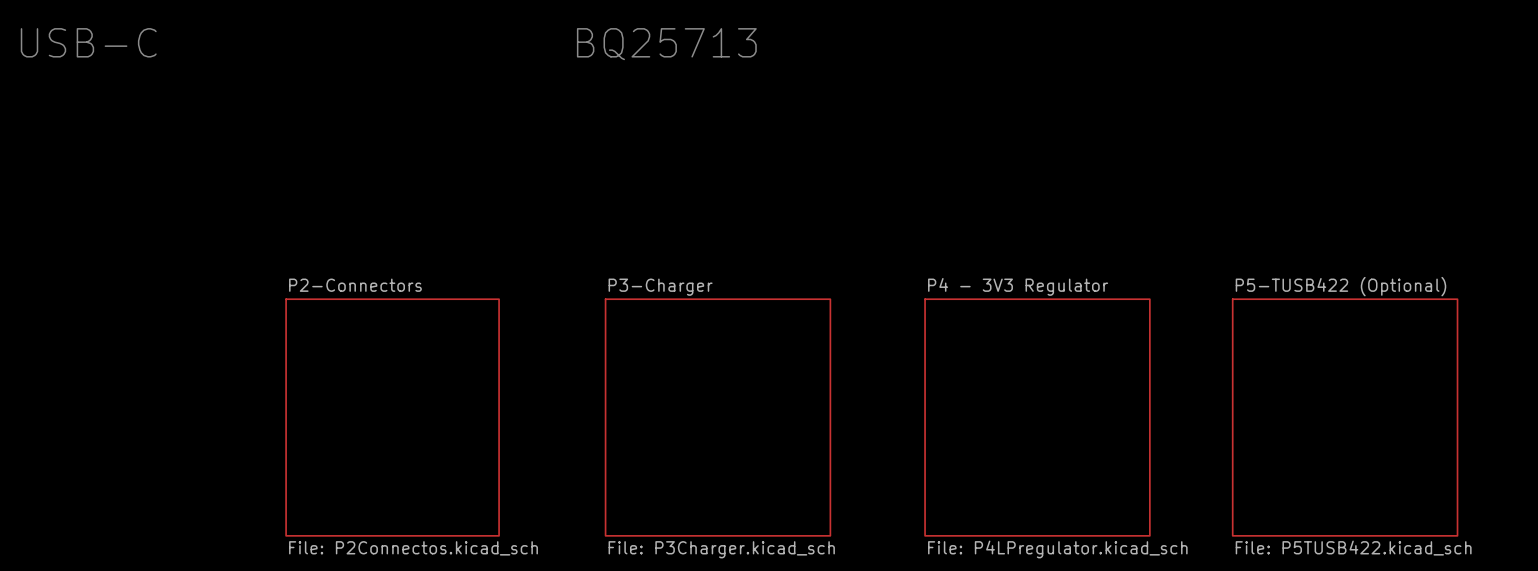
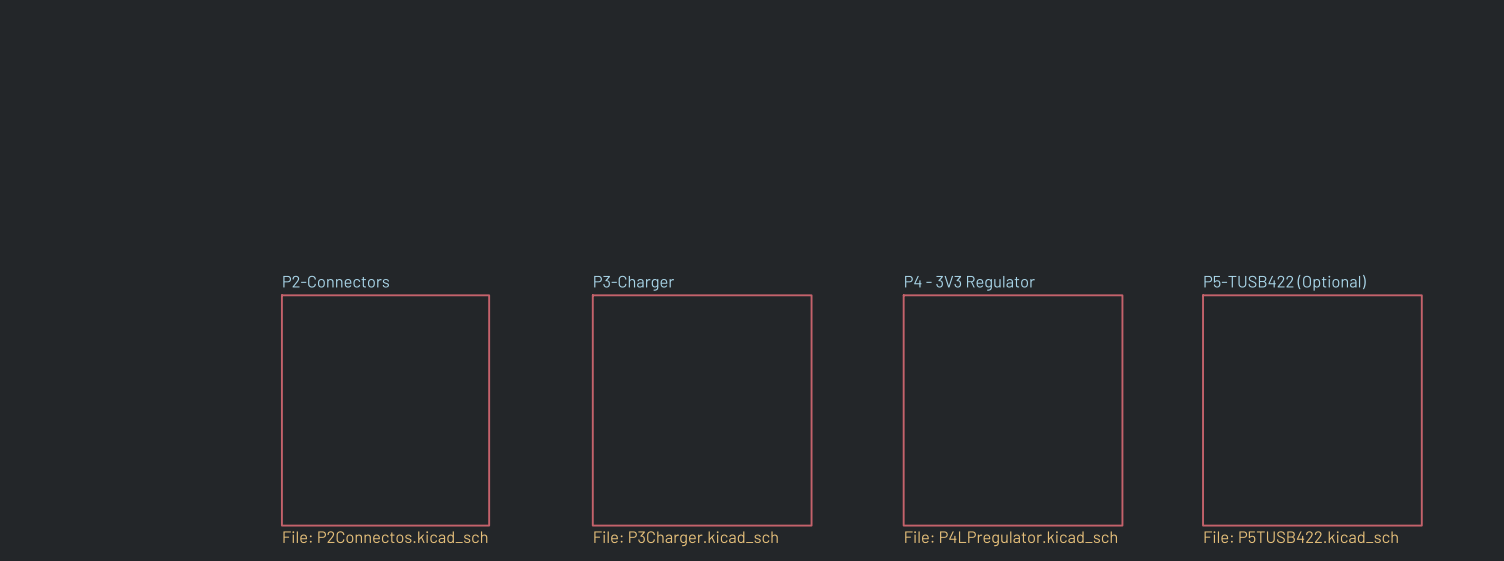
text: USB-C (88, 42) -> none
text: BQ25713 (666, 44) -> none

